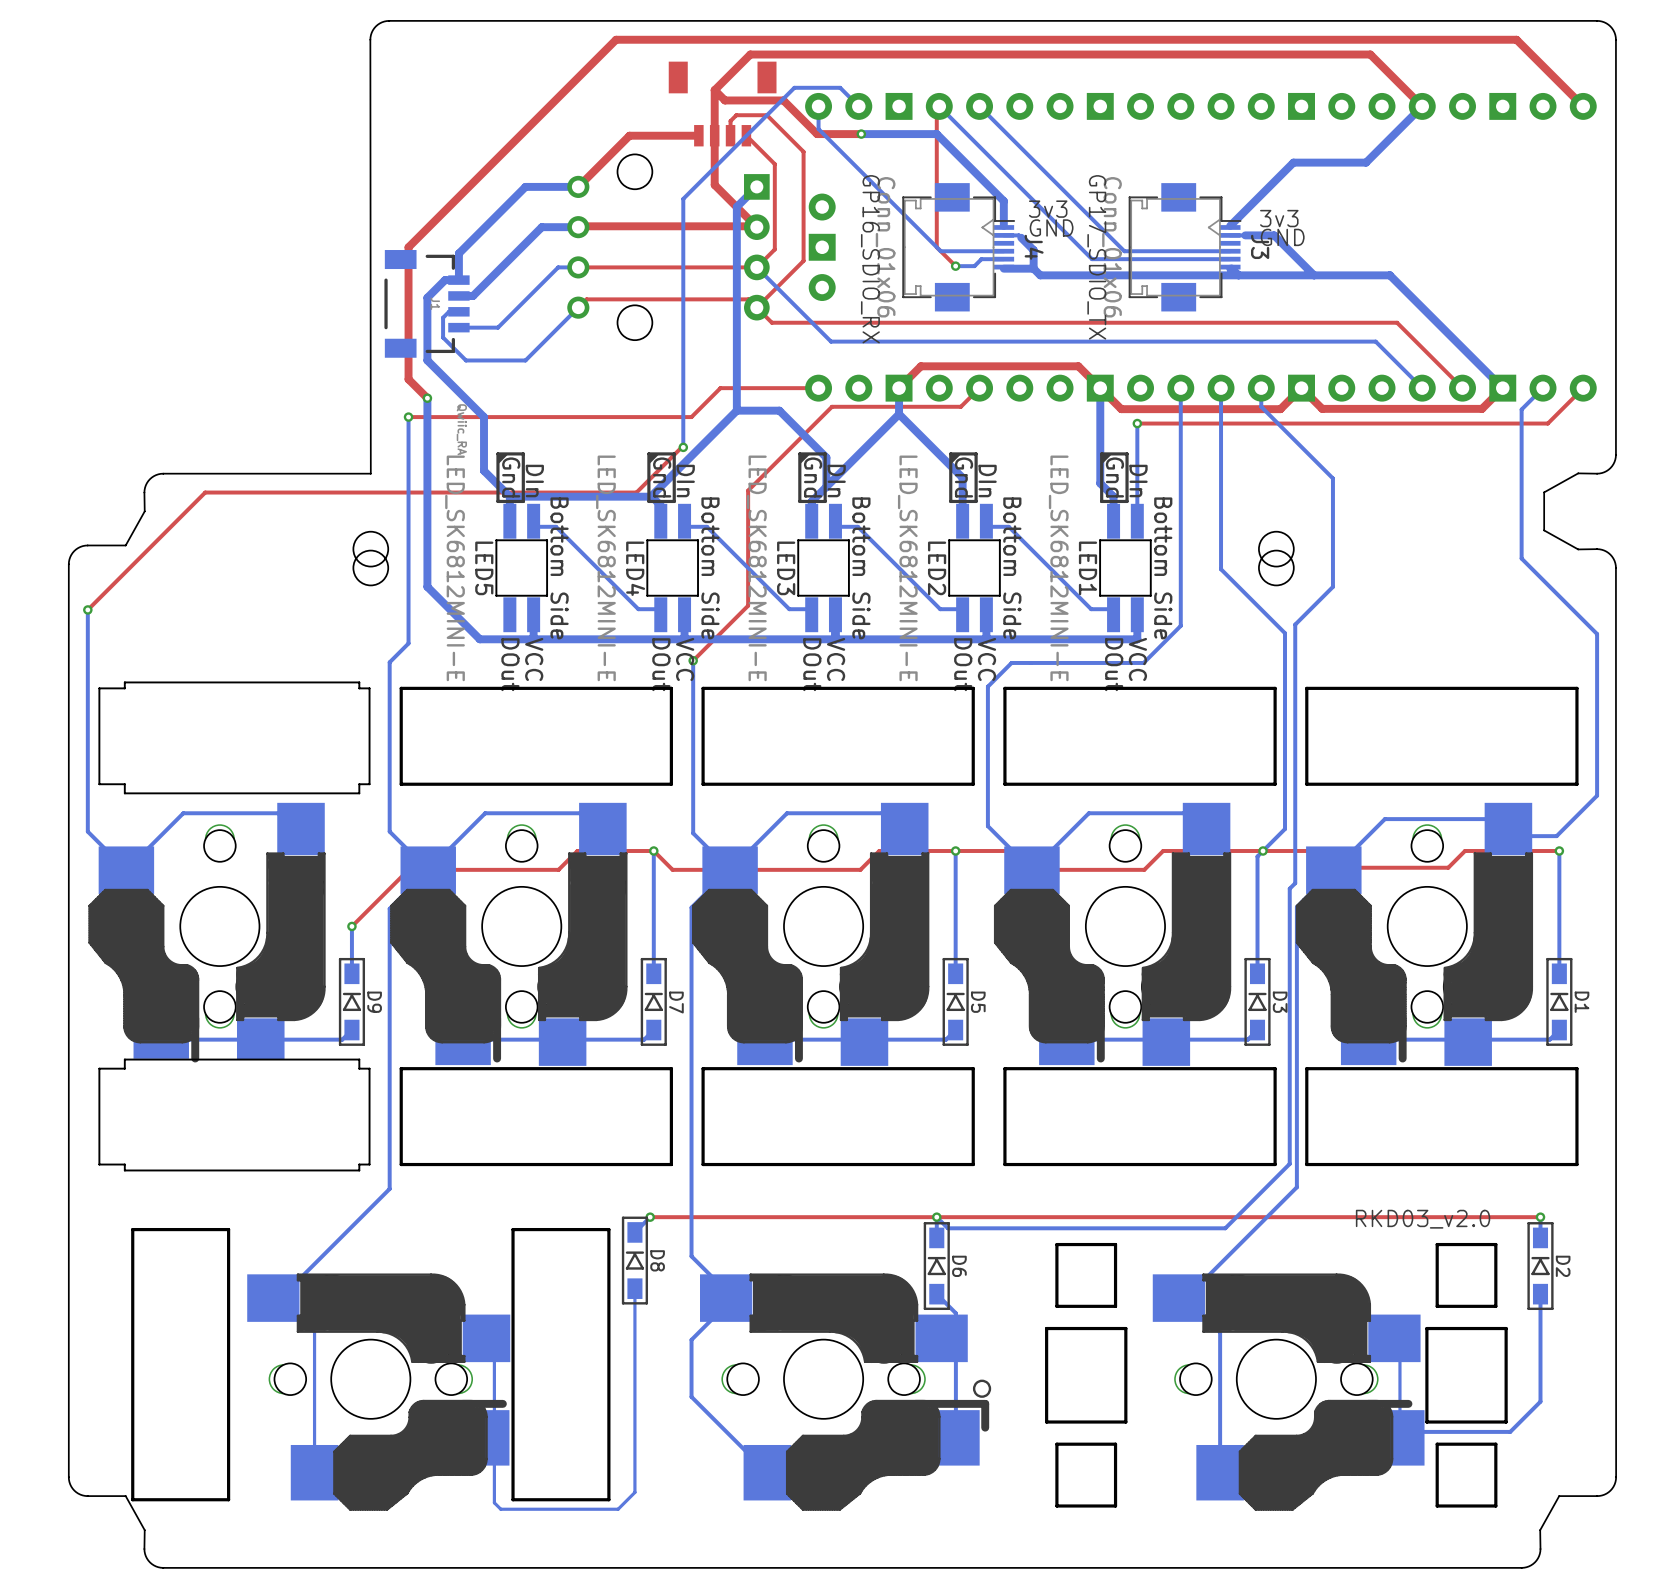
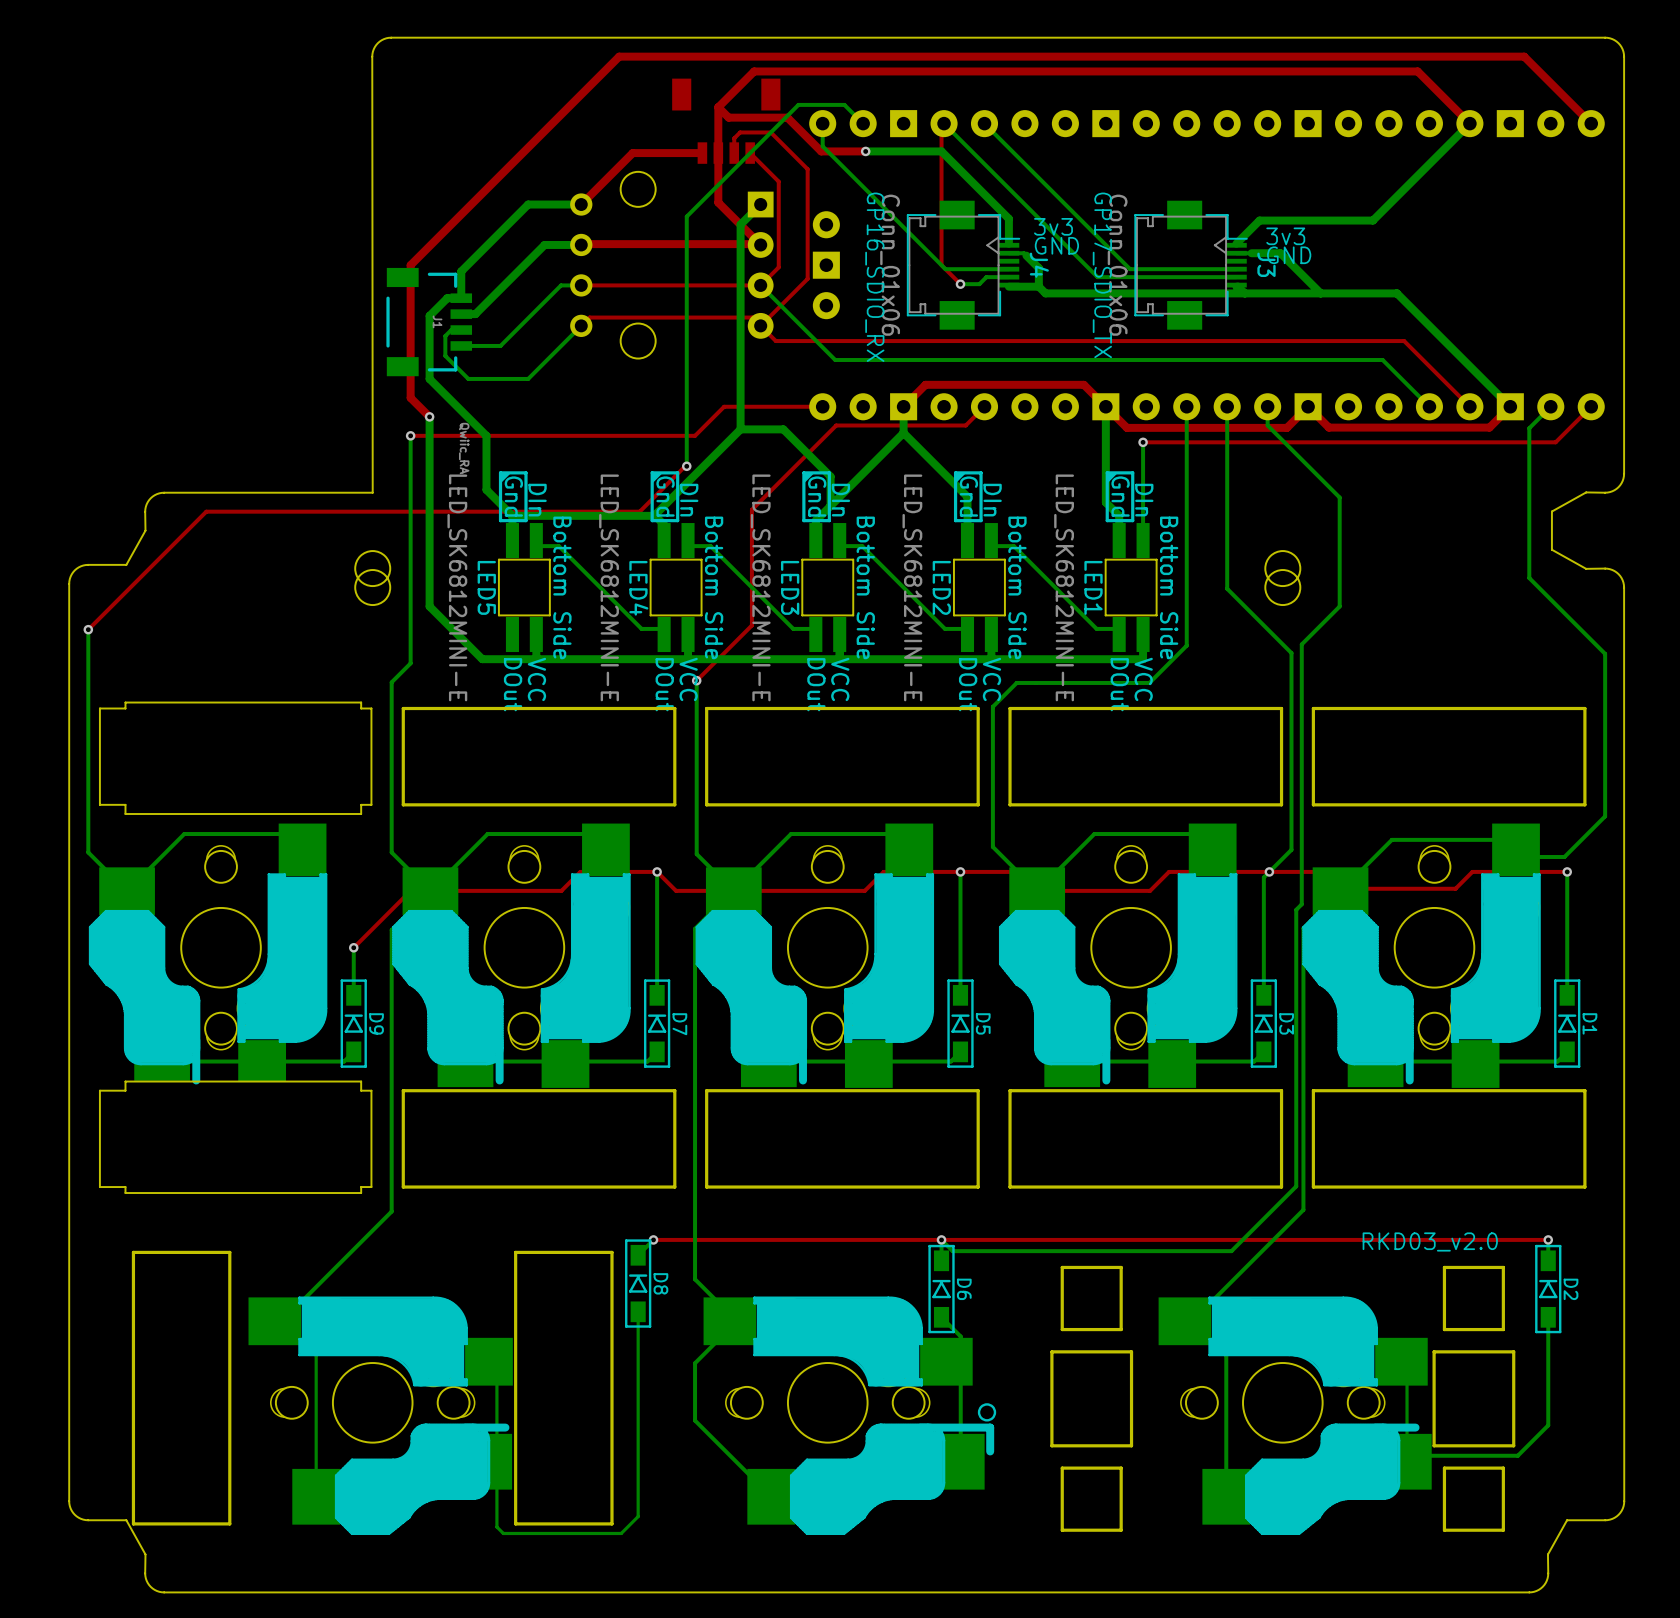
top track: (1370, 54) (1422, 106) -> (1377, 71) (1417, 71) (1469, 123)
bottom track: (1422, 106) (1366, 162) (1293, 162) (1253, 202) -> (1469, 123) (1372, 220) (1259, 220)

